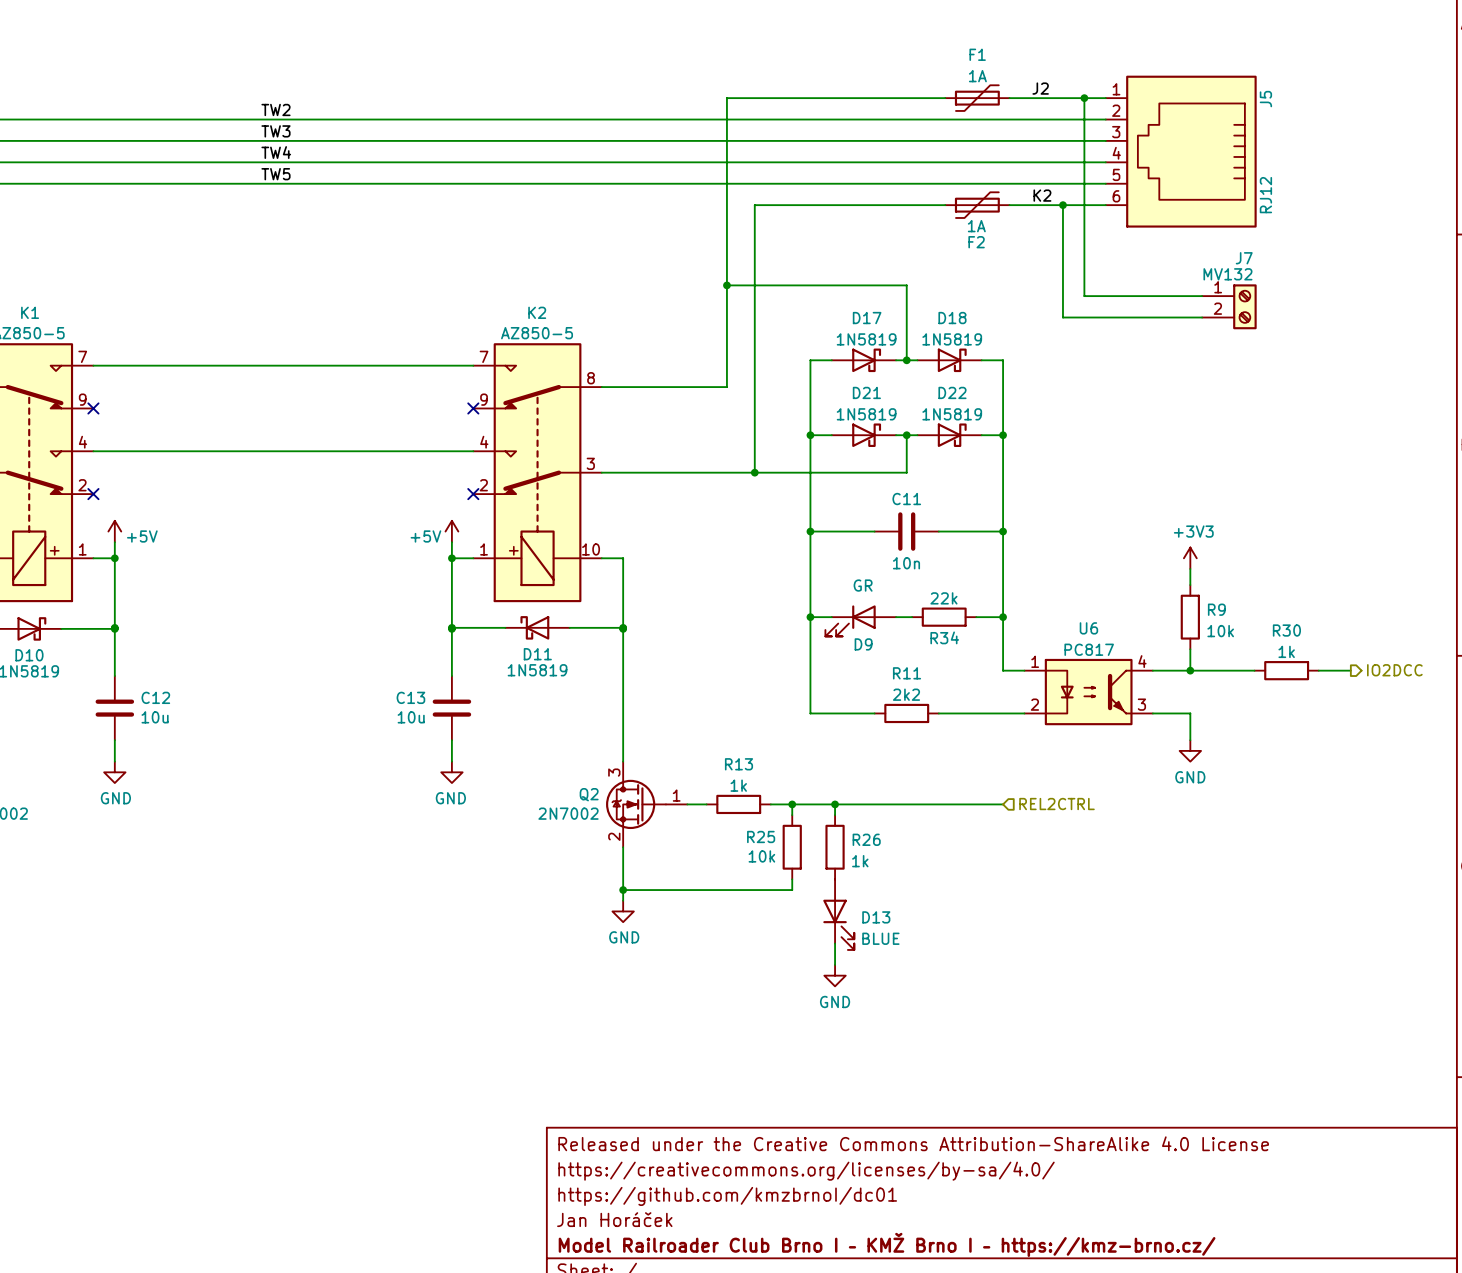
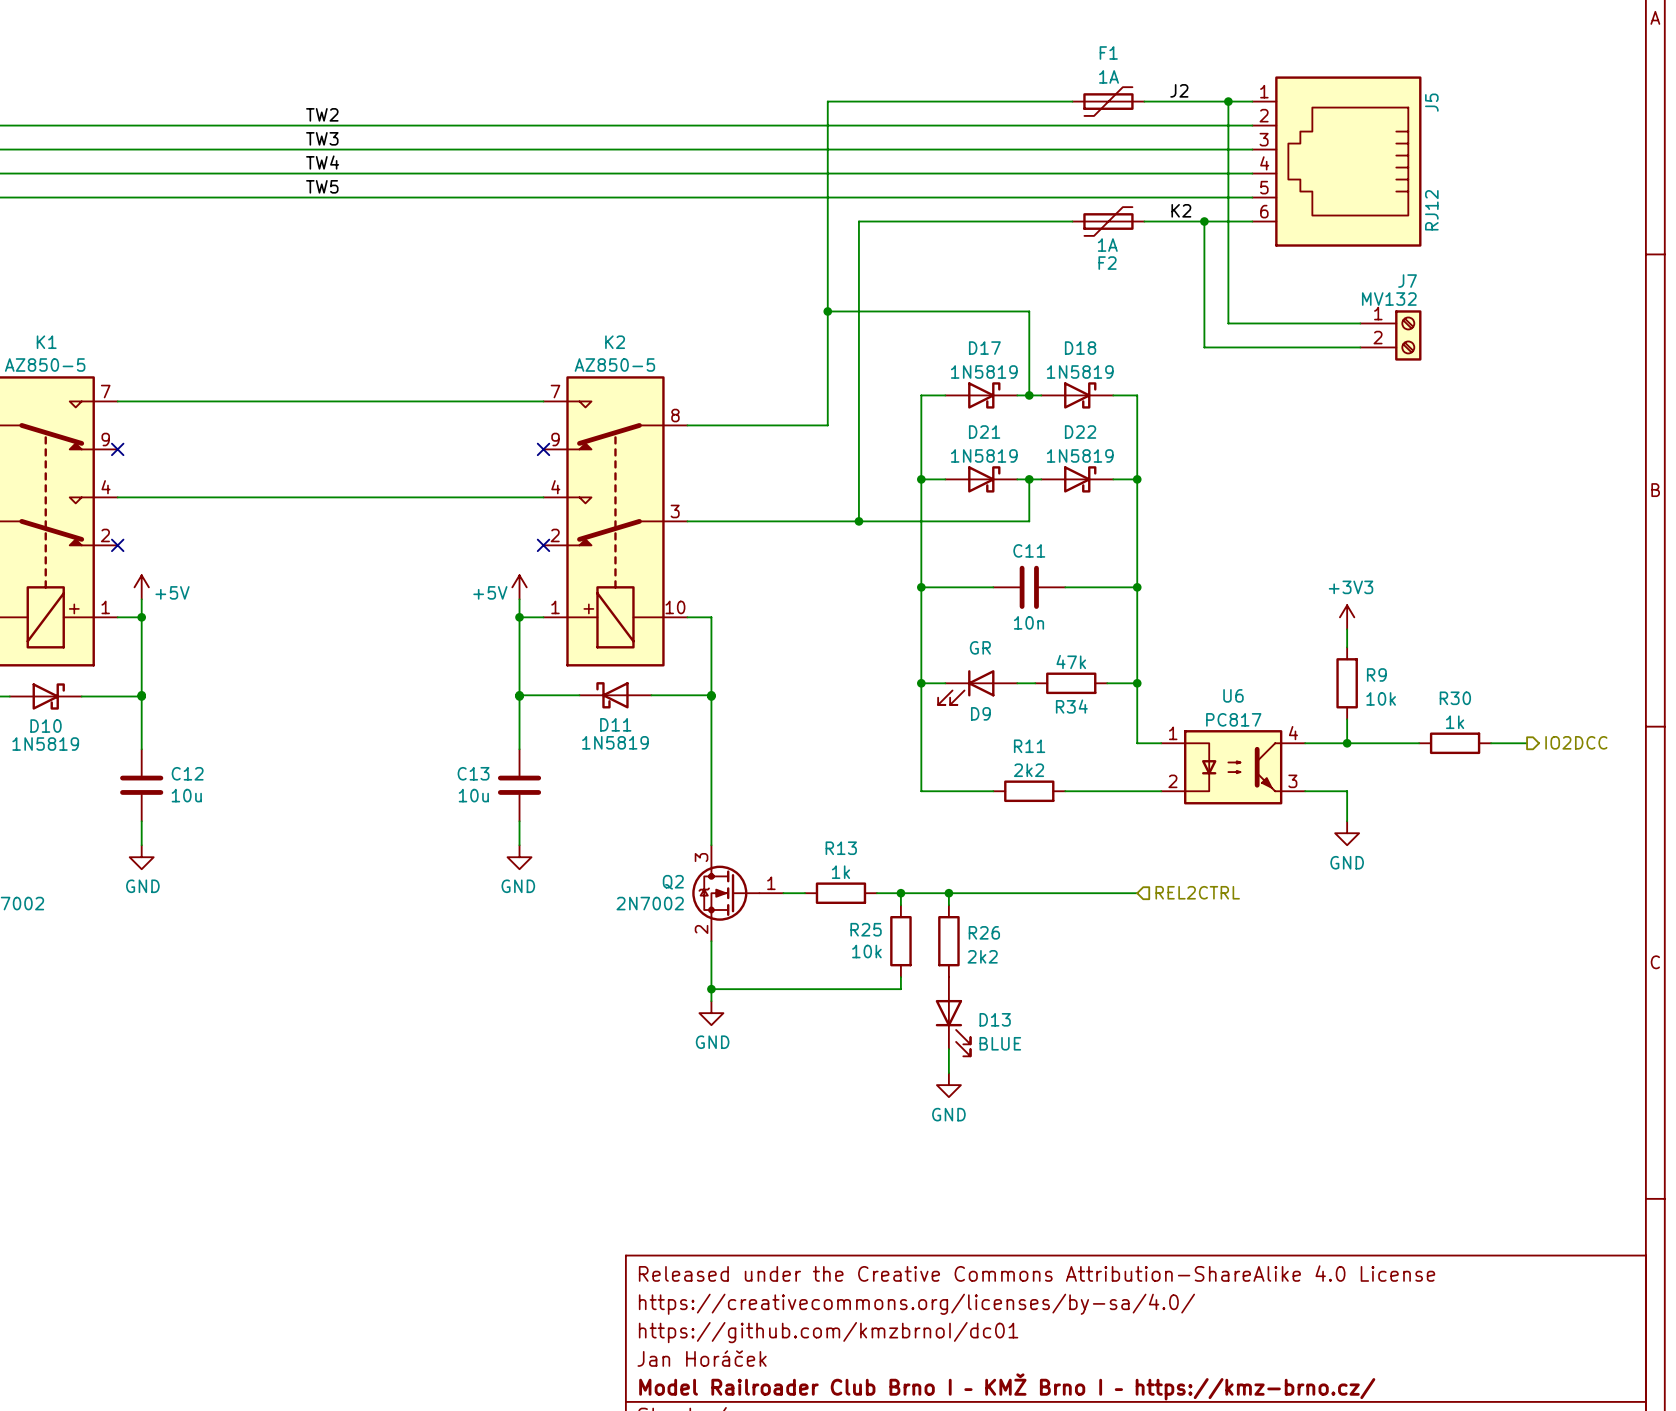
R34 value: 22k (943, 598) -> 47k (1071, 661)
R26 value: 1k (860, 861) -> 2k2 (982, 956)

